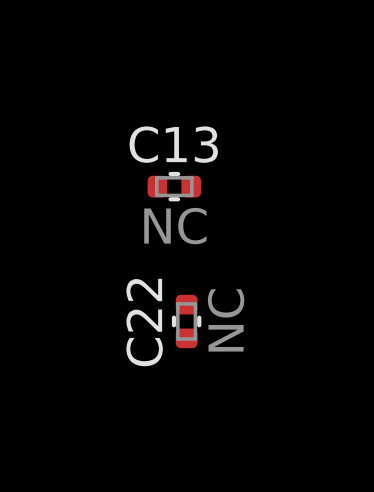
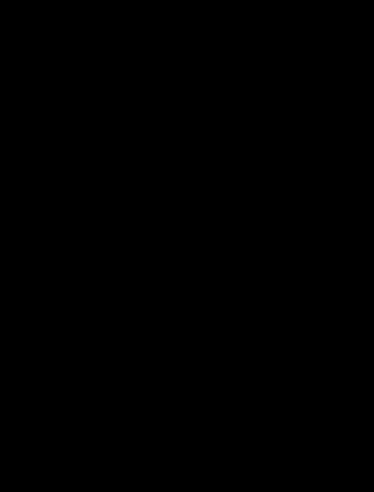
C13: NC (174, 186) -> none
C22: NC (186, 321) -> none

